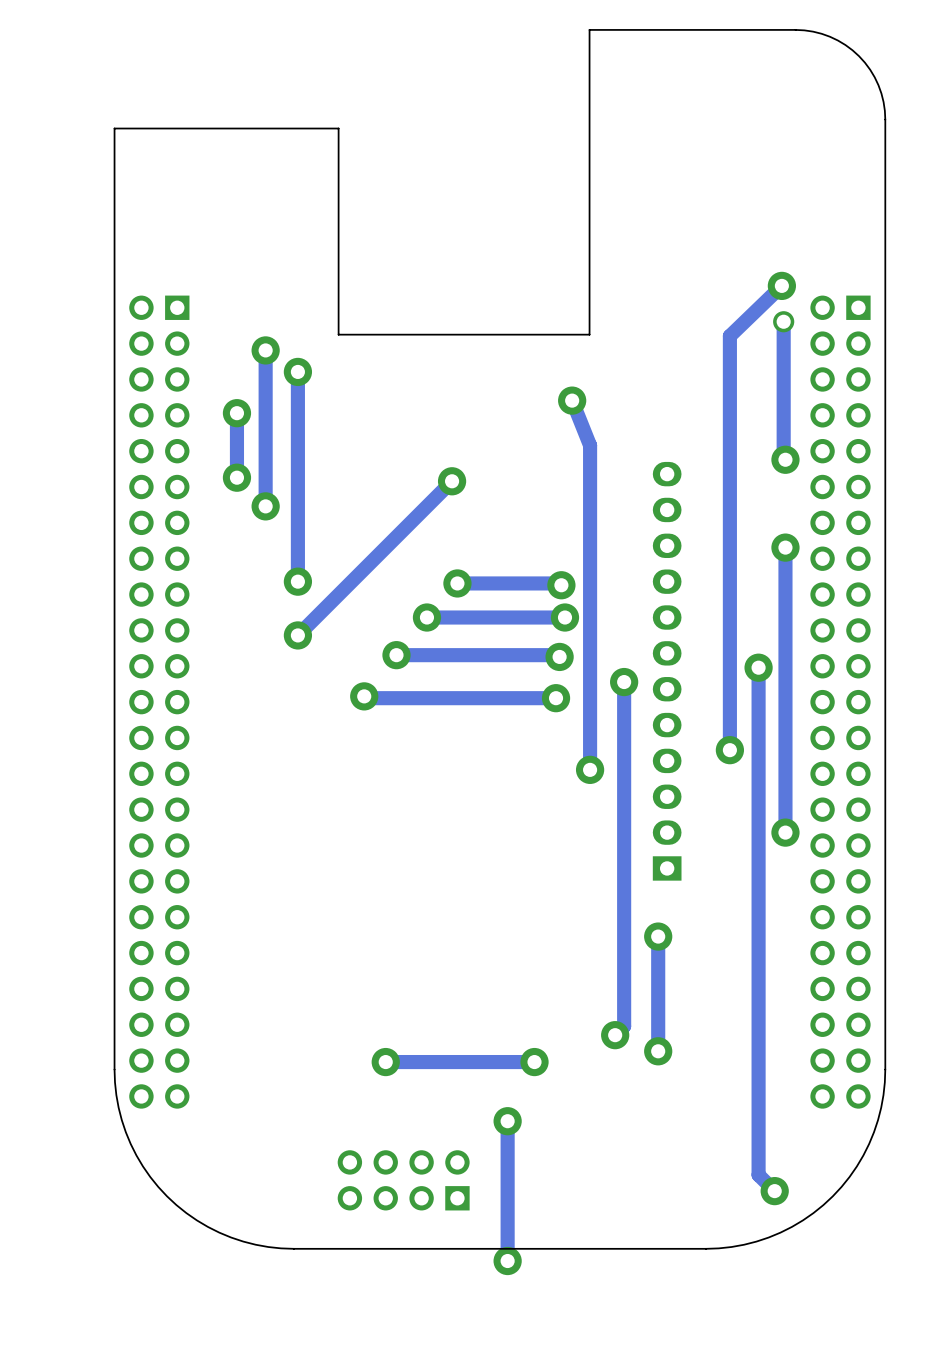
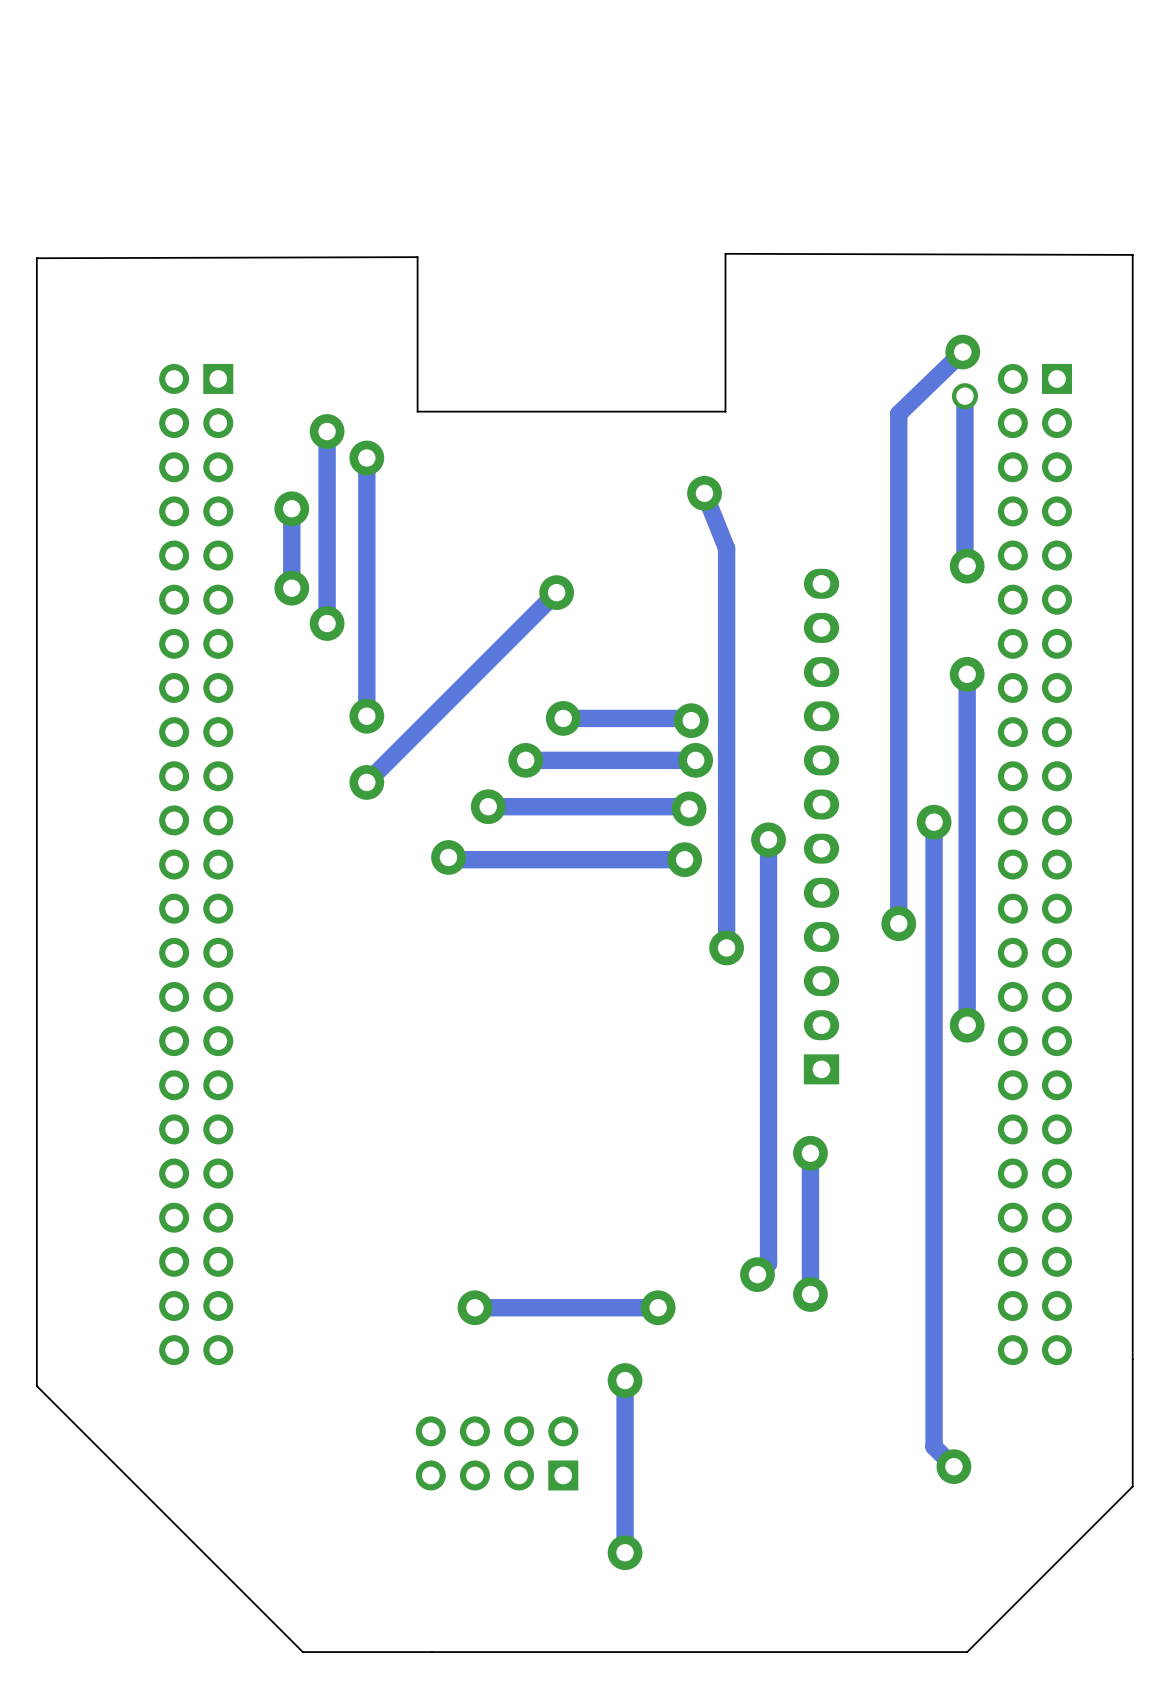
board edge: (795, 29) (589, 29) (589, 334) (338, 334) (338, 128) (114, 128) (114, 1082) (118, 1107) (125, 1132) (142, 1166) (158, 1186) (176, 1205) (196, 1220) (219, 1232) (255, 1244) (293, 1248) (706, 1248) (731, 1247) (756, 1241) (780, 1232) (813, 1213) (841, 1186) (856, 1166) (869, 1144) (881, 1107) (885, 1069) (884, 110) (881, 93) (874, 77) (864, 62) (852, 50) (837, 40) (821, 33) (795, 29) -> (725, 253) (1132, 254) (1132, 1486) (967, 1652) (302, 1652) (36, 1386) (36, 258) (417, 257) (417, 411) (725, 411) (725, 253)

